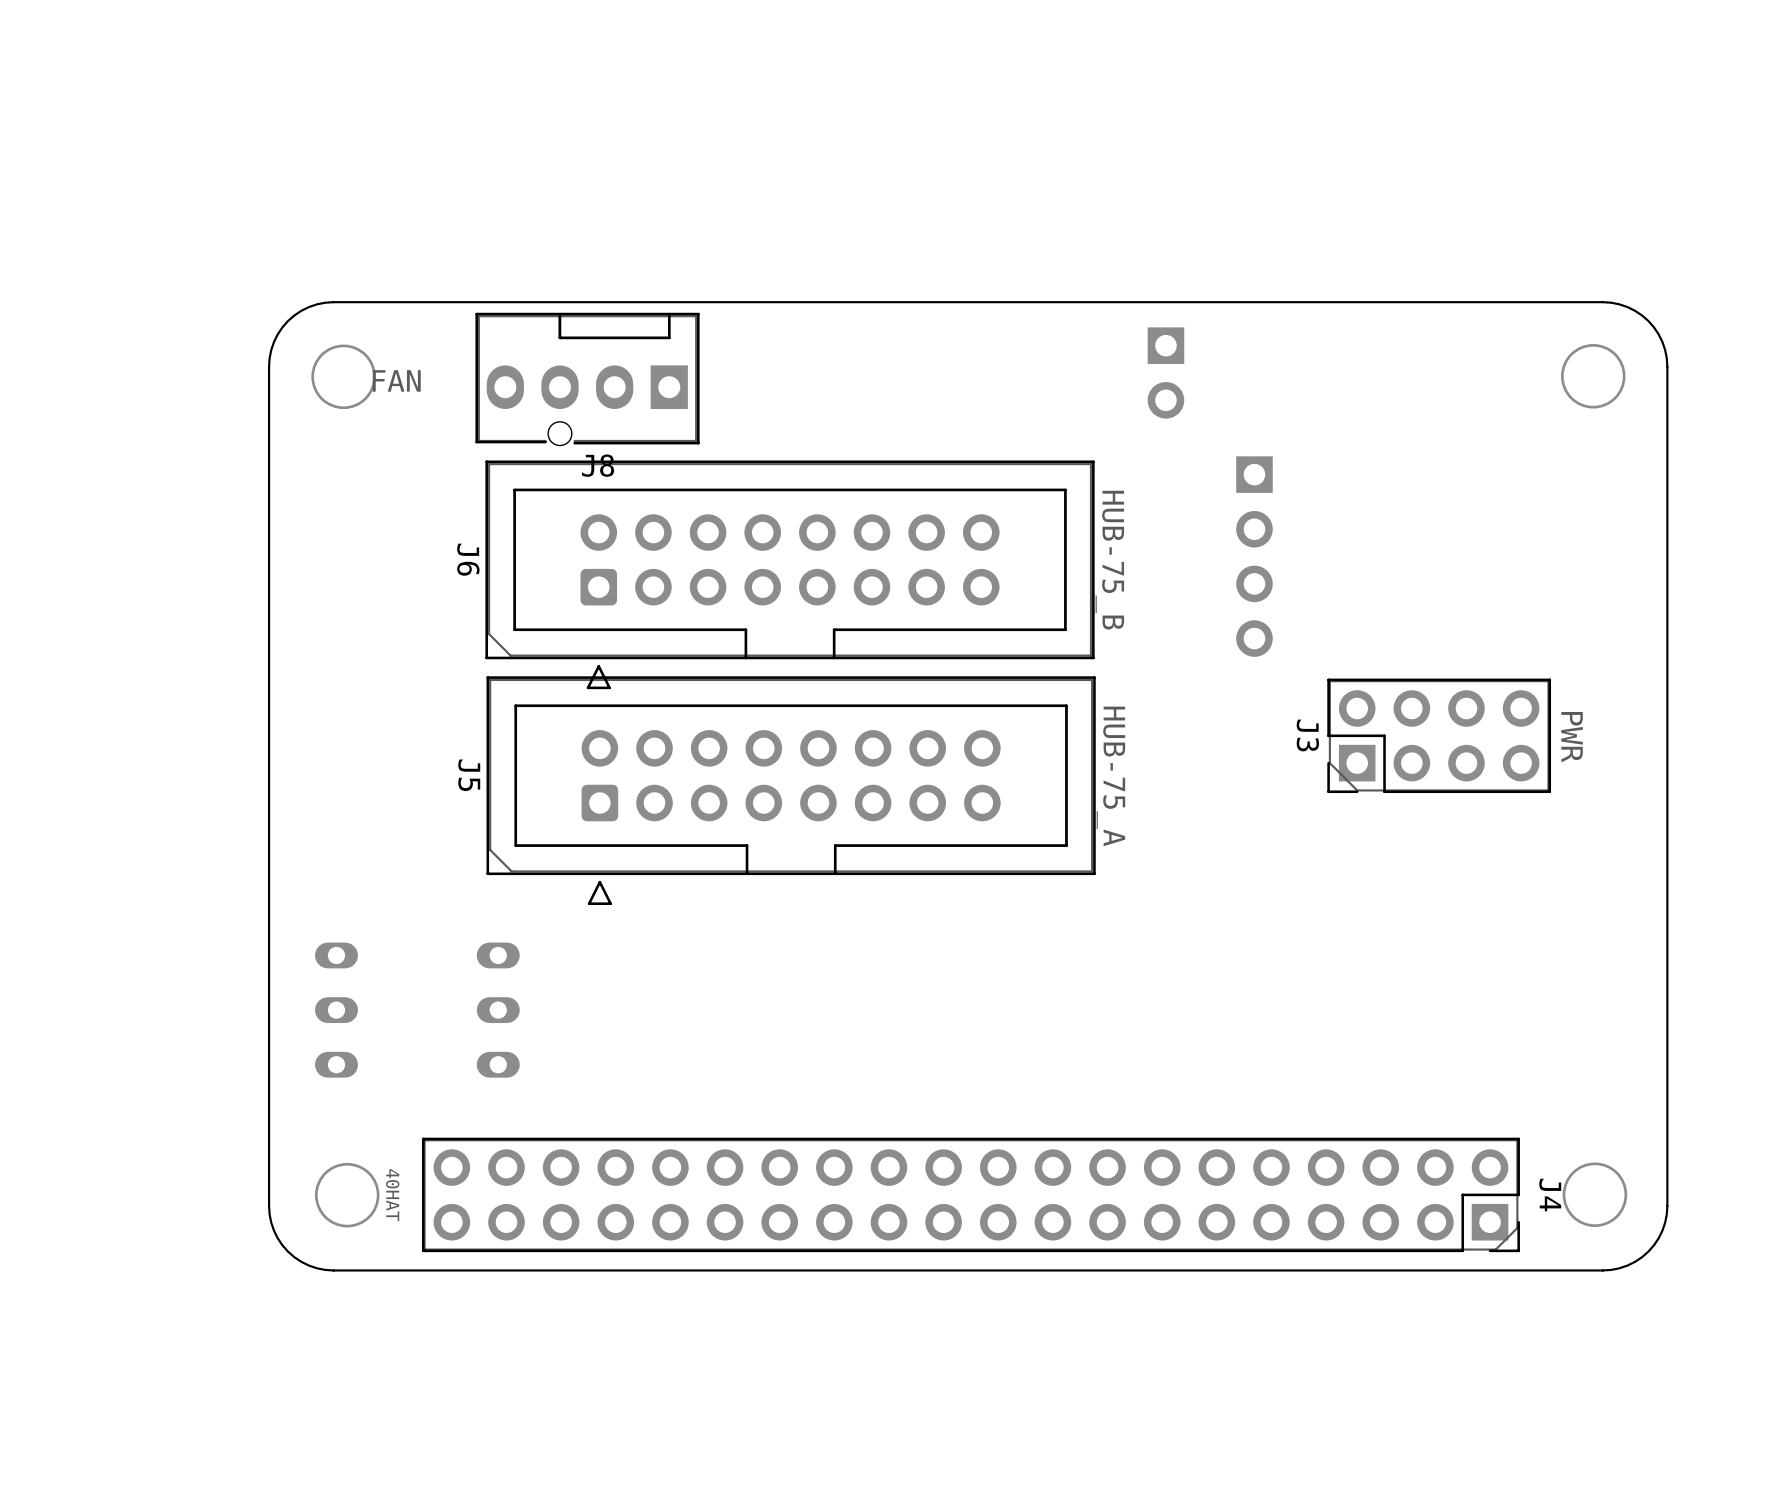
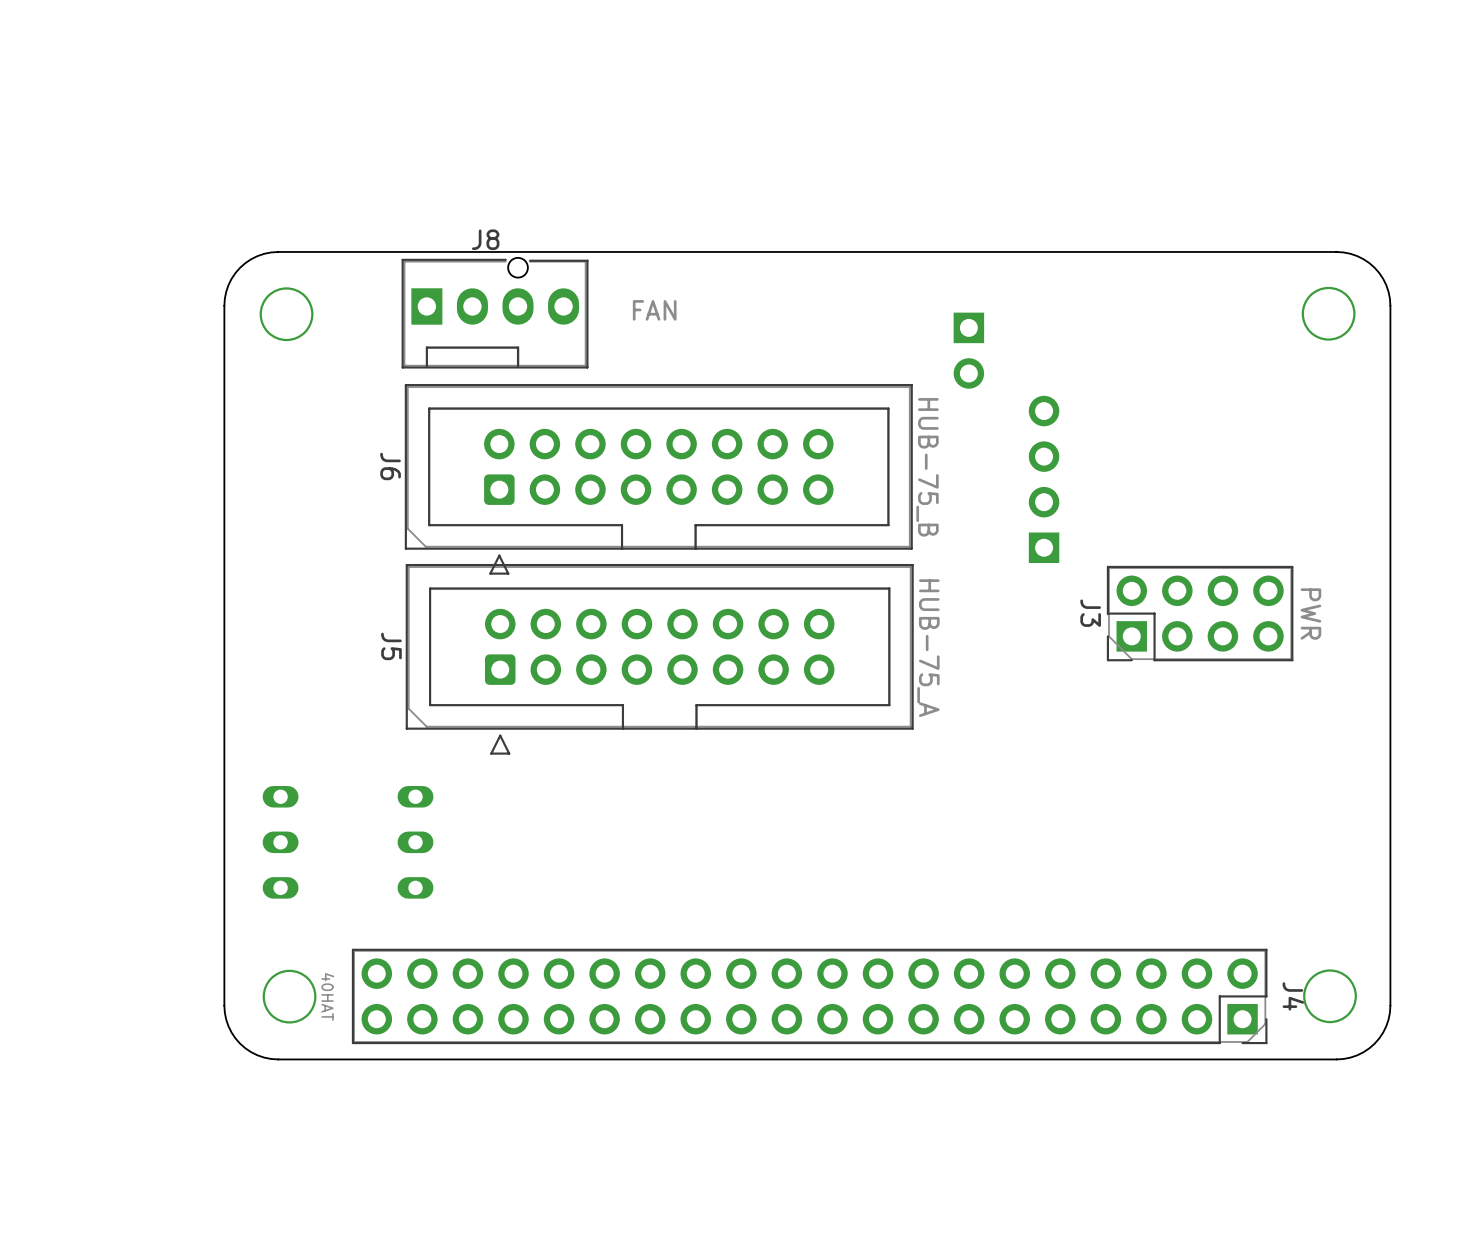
part position: (1165, 372) -> (968, 350)
J8 rotation: 0° (587, 379) -> 180° (495, 313)
part rotation: 0° (1254, 556) -> 180° (1044, 479)

